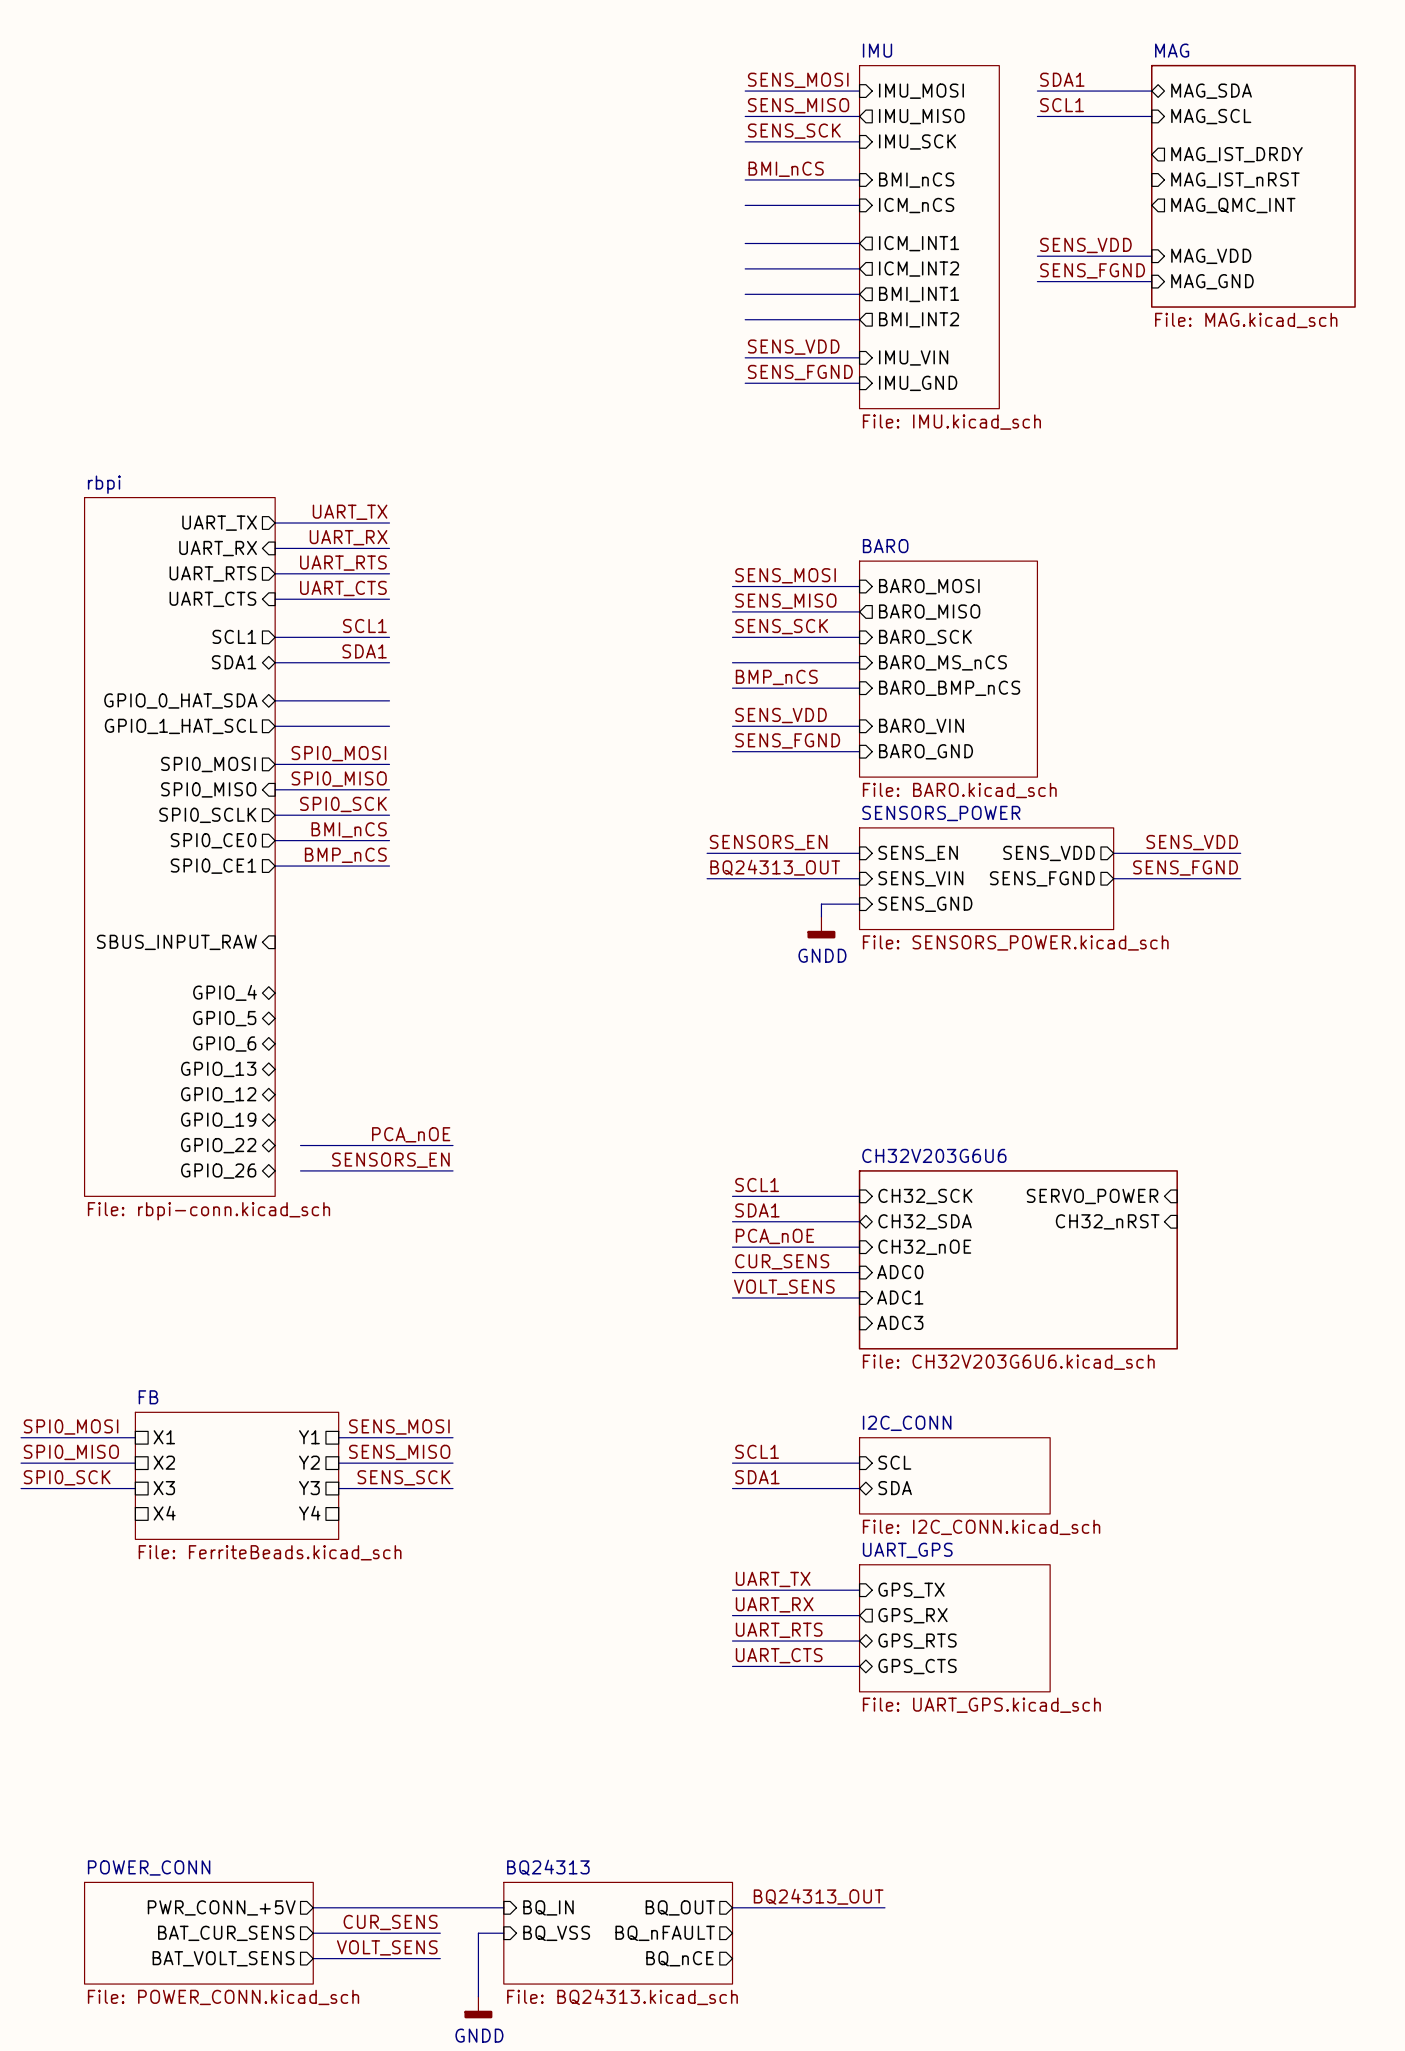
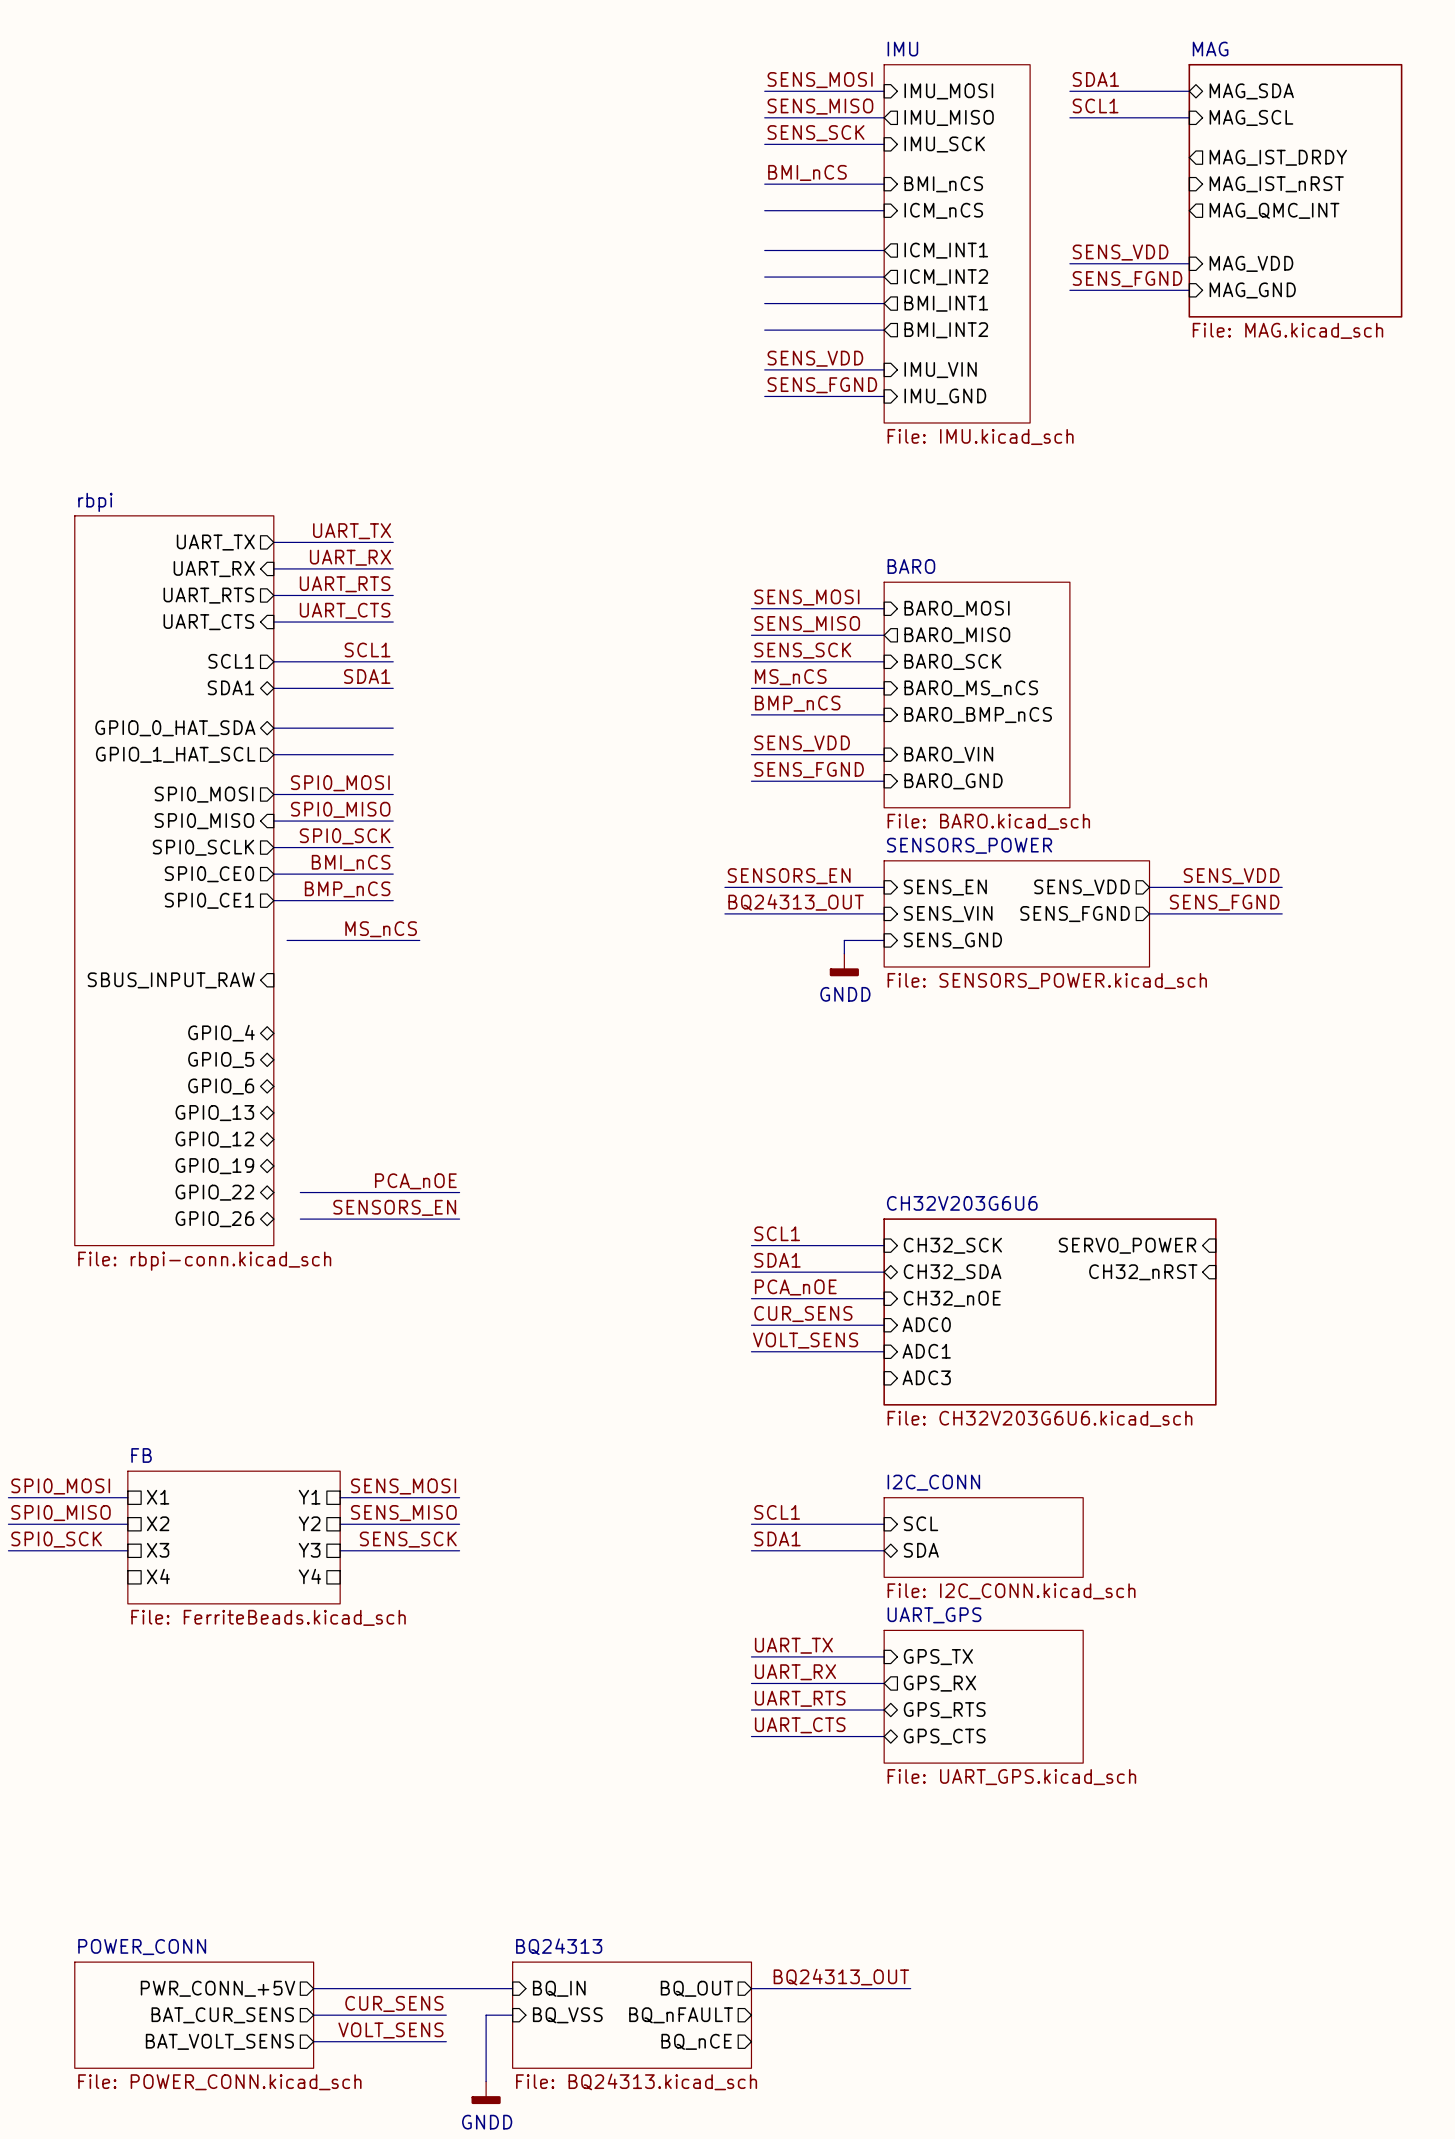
label: none -> MS_nCS (790, 677)
label: none -> MS_nCS (381, 929)
wire: none -> (287, 940) (419, 940)

